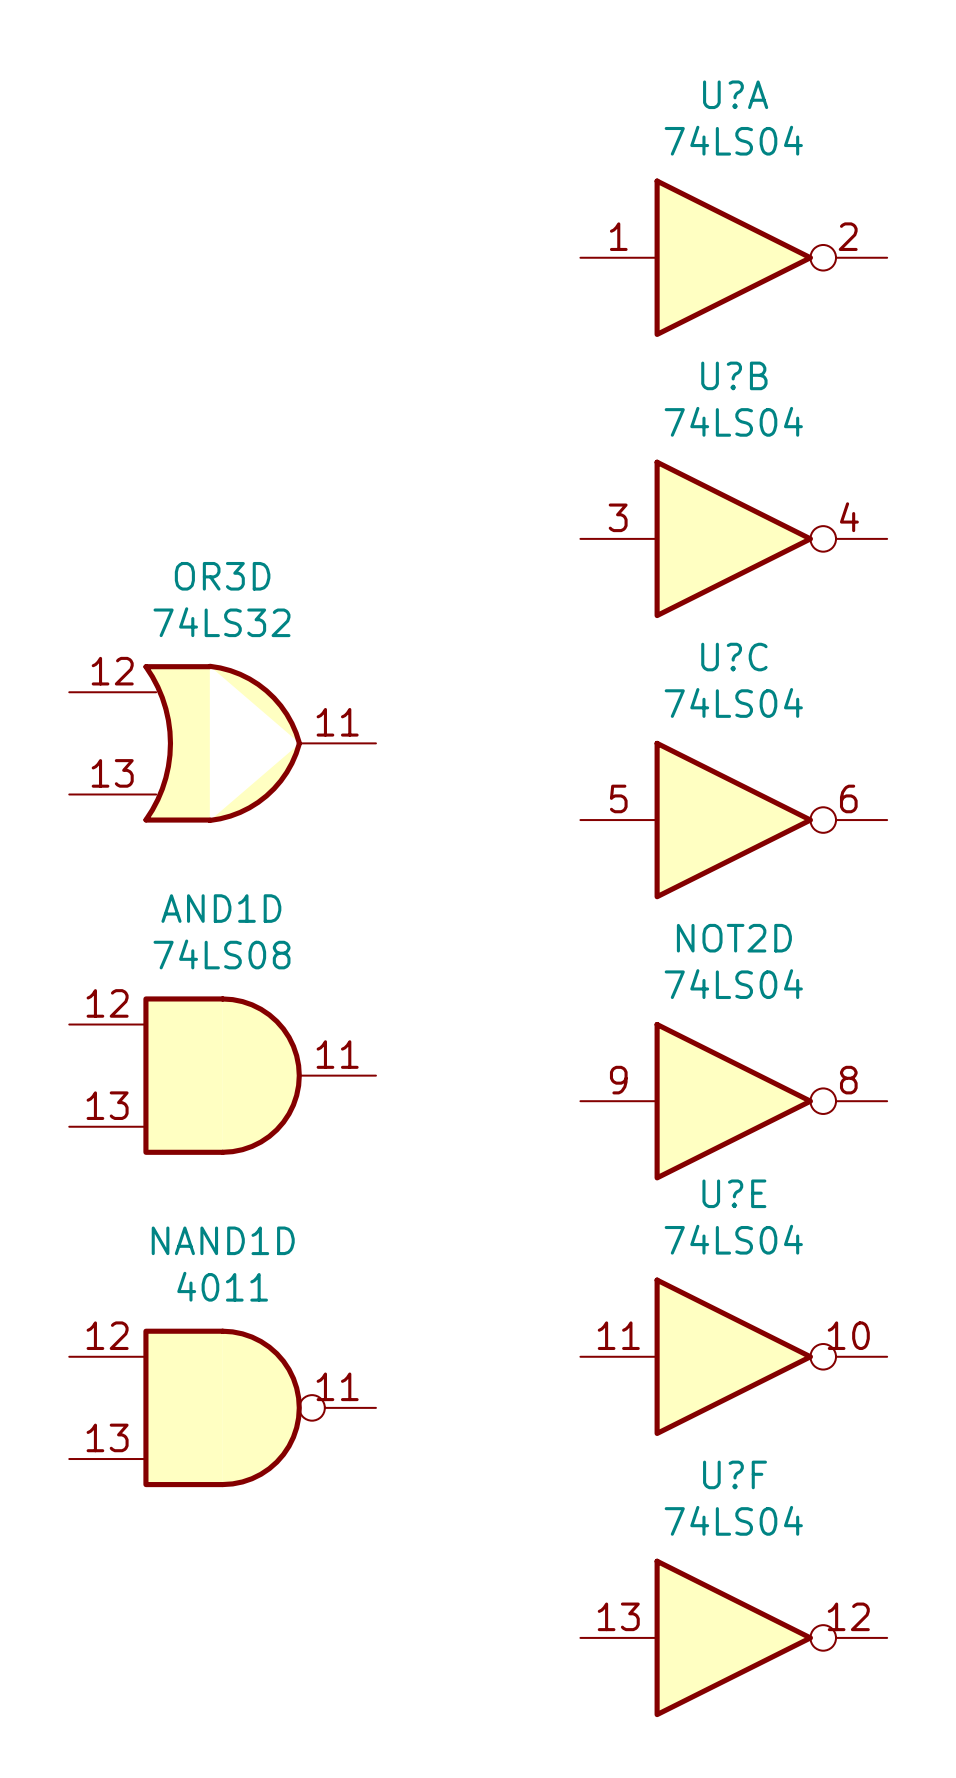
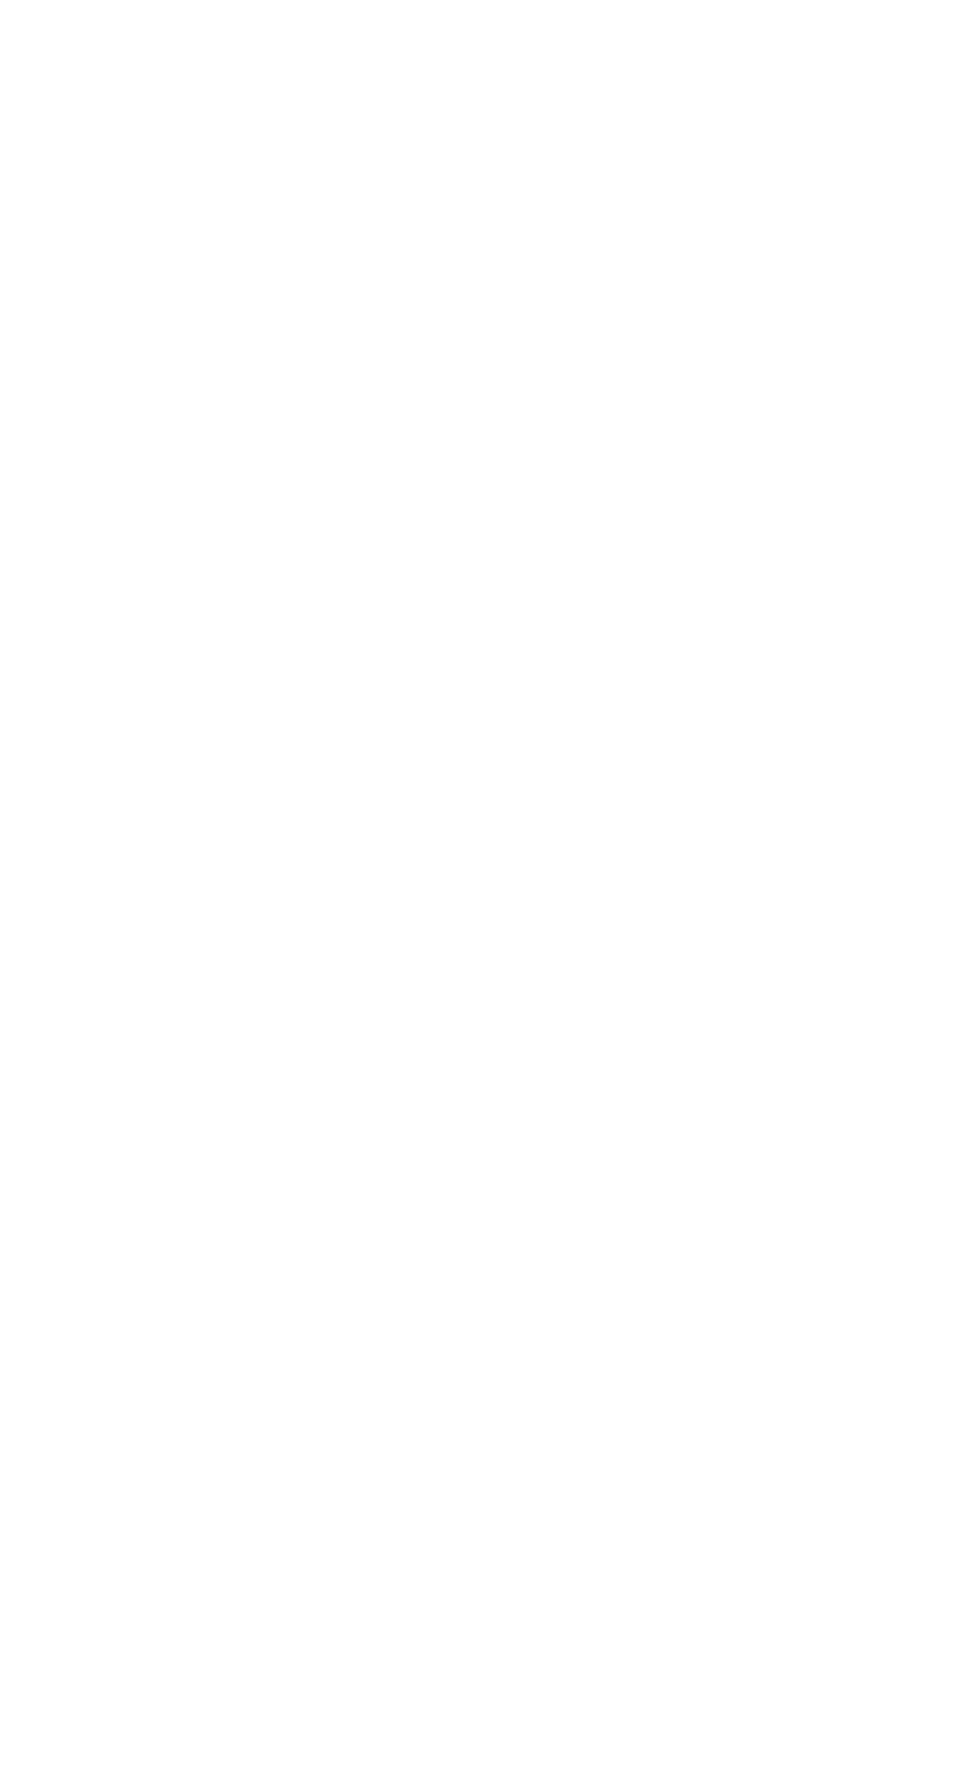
U?A: 74LS04 (733, 257) -> none
U?B: 74LS04 (733, 538) -> none
OR3D: 74LS32 (222, 743) -> none
U?C: 74LS04 (733, 820) -> none
AND1D: 74LS08 (222, 1075) -> none
NOT2D: 74LS04 (733, 1101) -> none
U?E: 74LS04 (733, 1356) -> none
NAND1D: 4011 (222, 1407) -> none
U?F: 74LS04 (733, 1637) -> none

